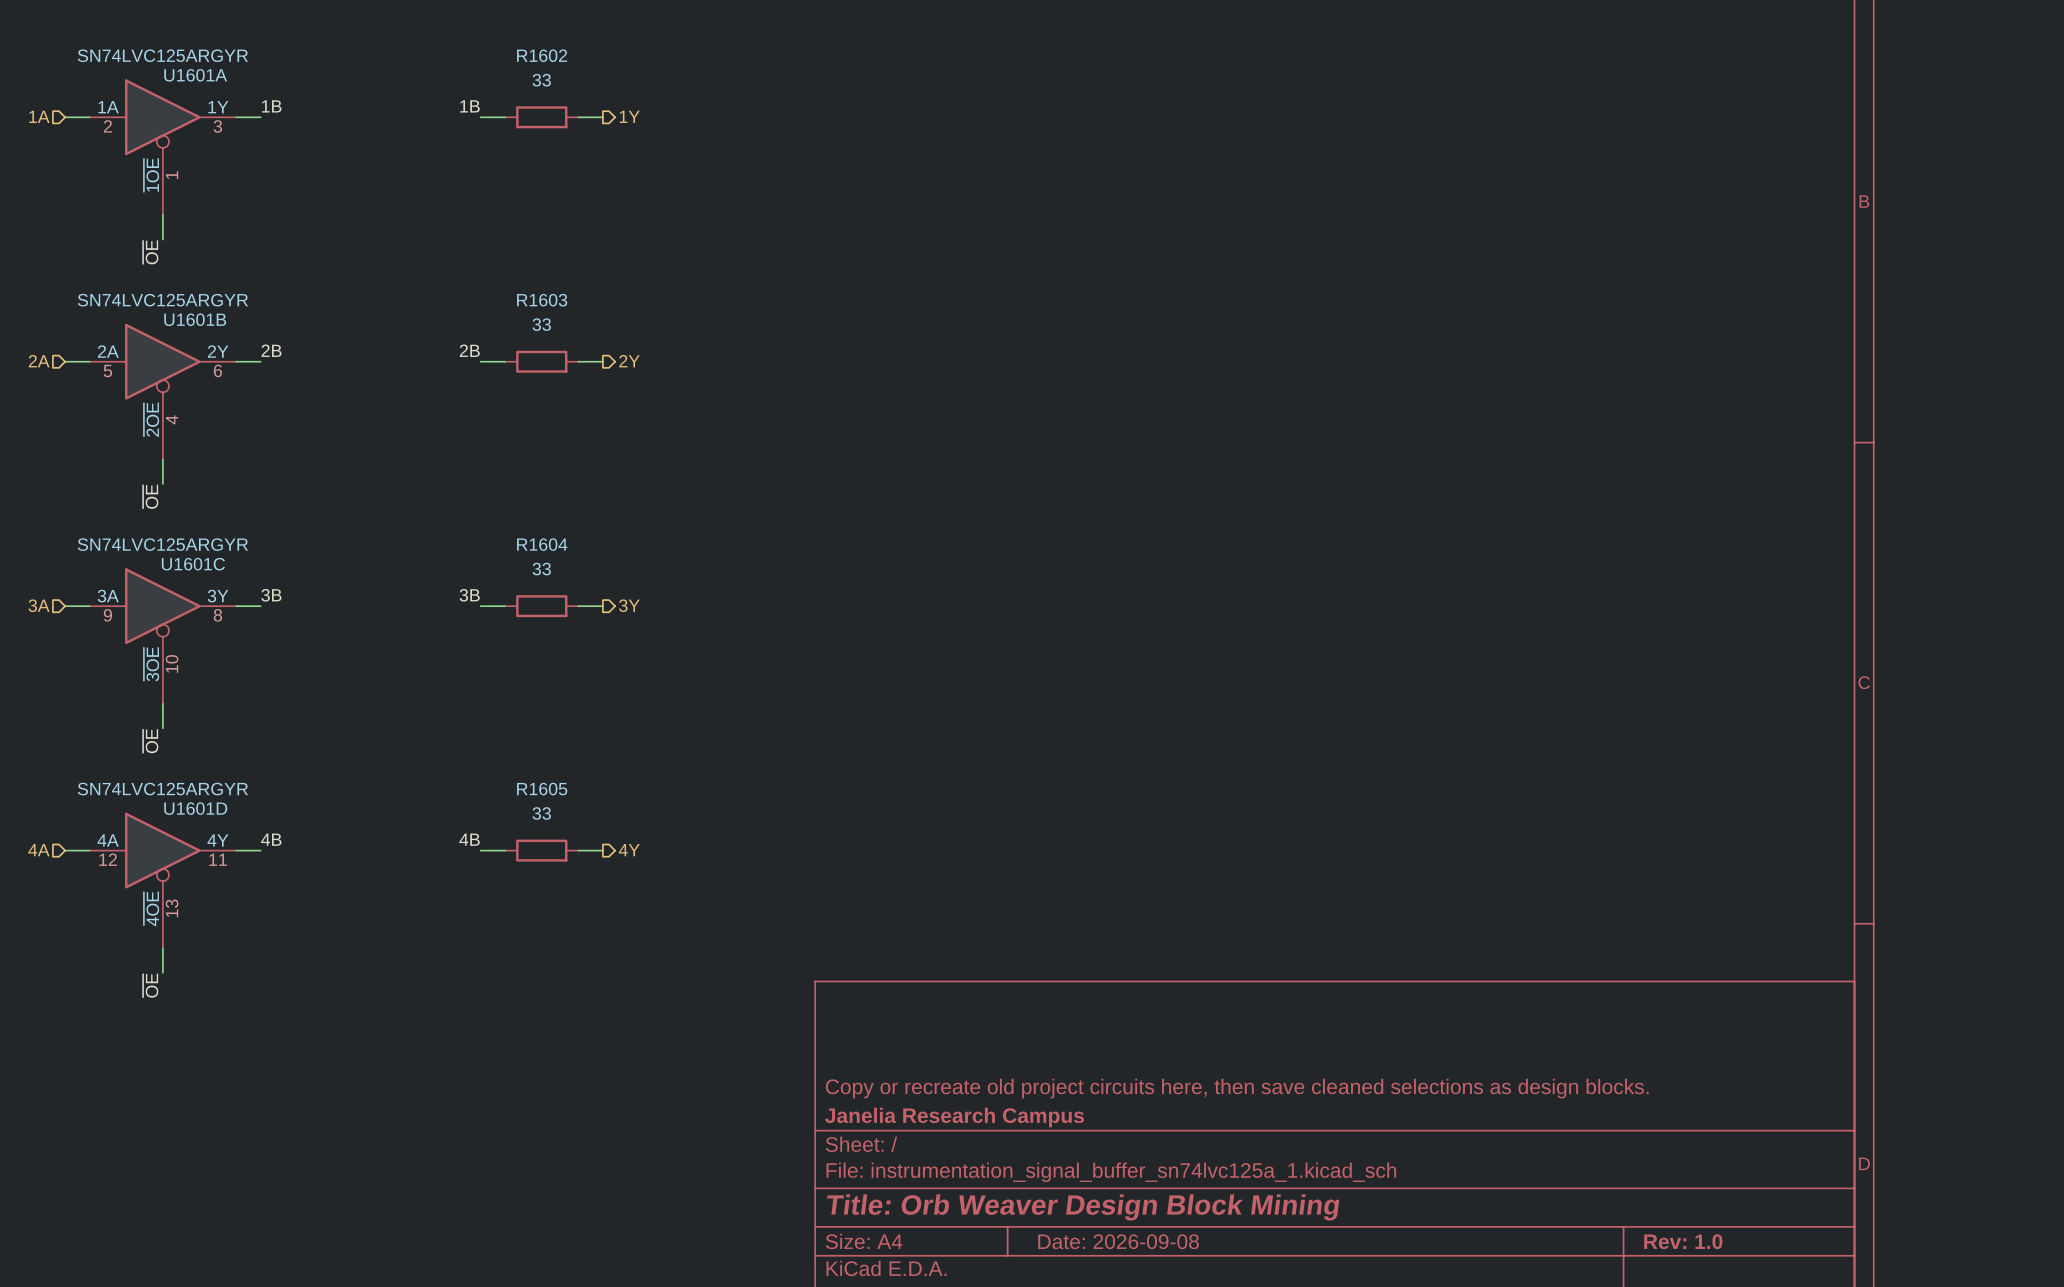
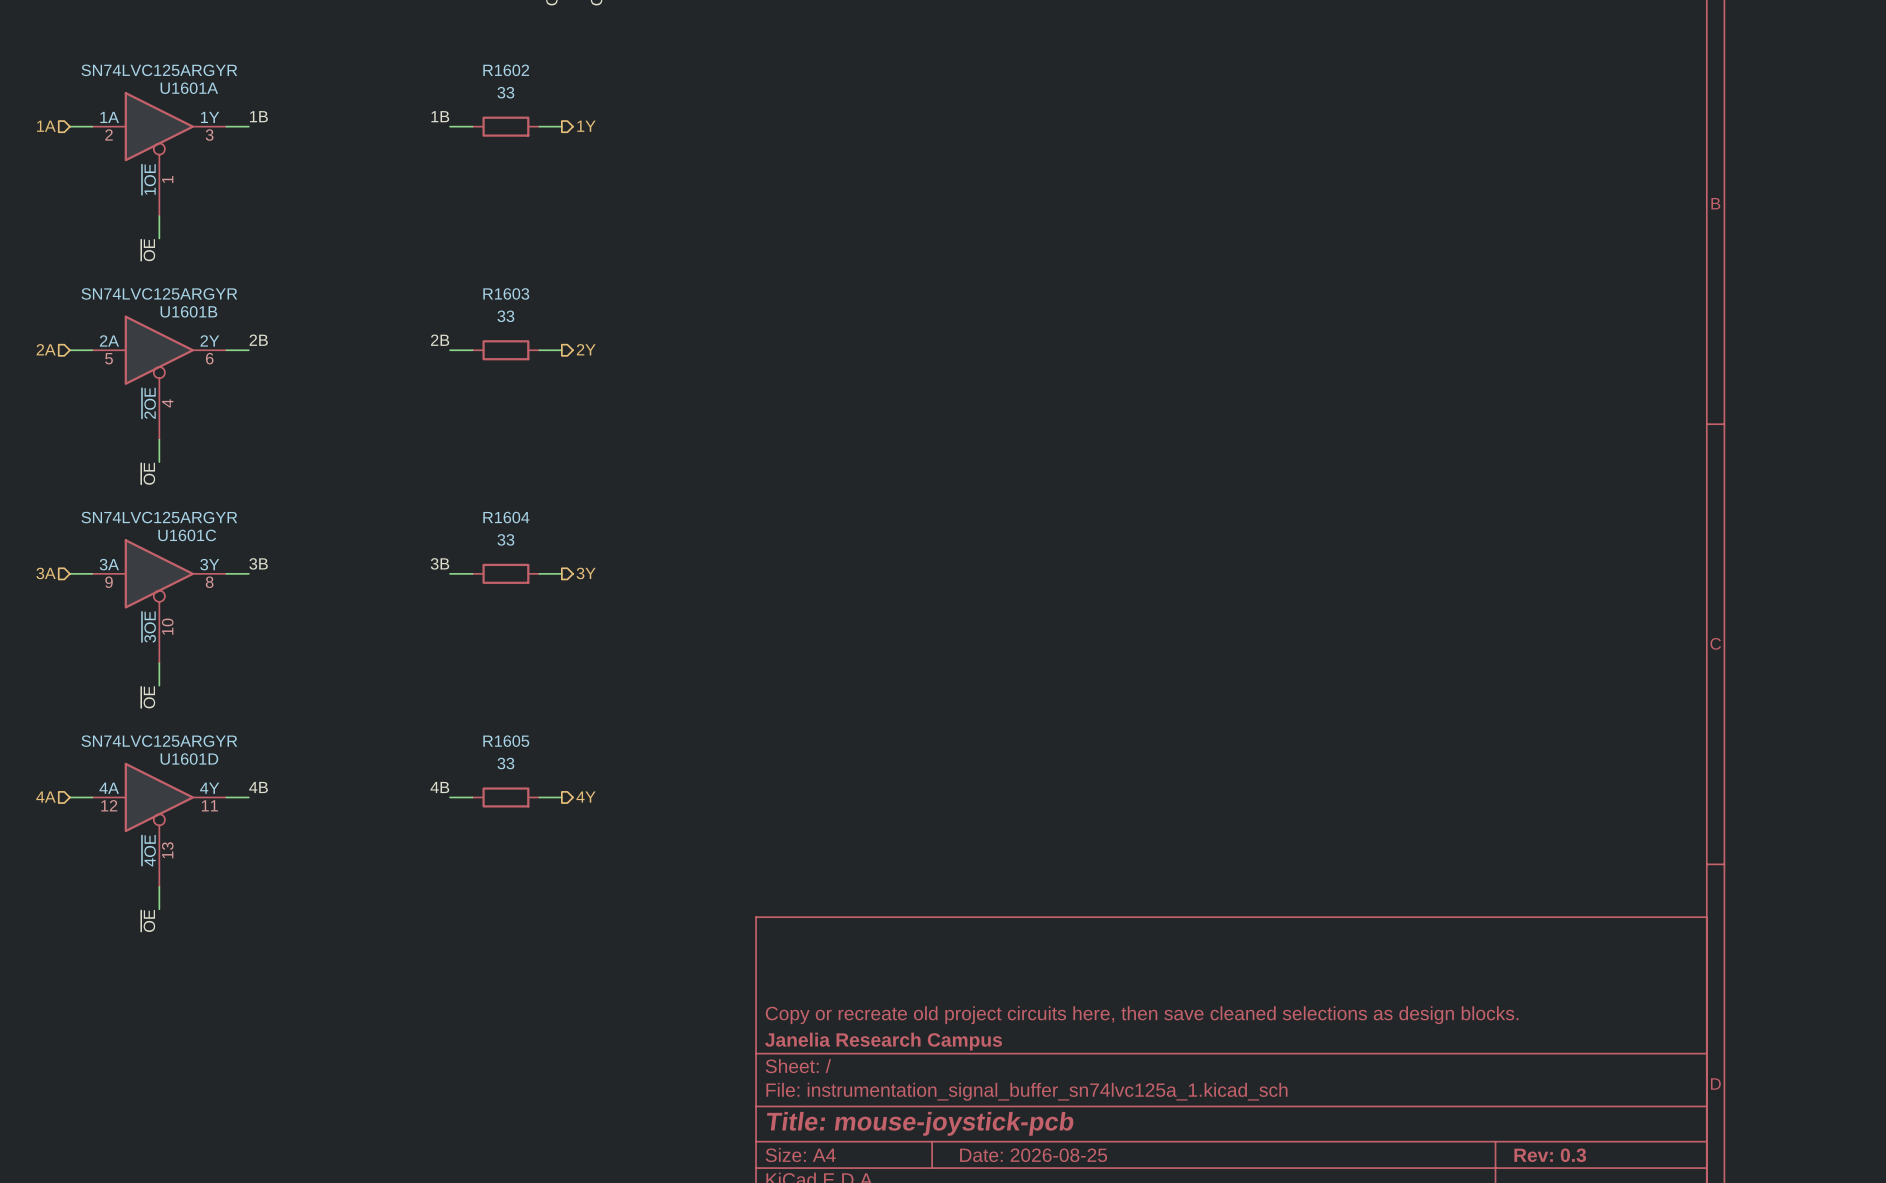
title block: Title: Orb Weaver Design Block Mining (1083, 1207) -> Title: mouse-joystick-pcb (920, 1123)
title block: Date: 2026-09-08 (1118, 1241) -> Date: 2026-08-25 (1033, 1155)
title block: Rev: 1.0 (1683, 1241) -> Rev: 0.3 (1550, 1155)

